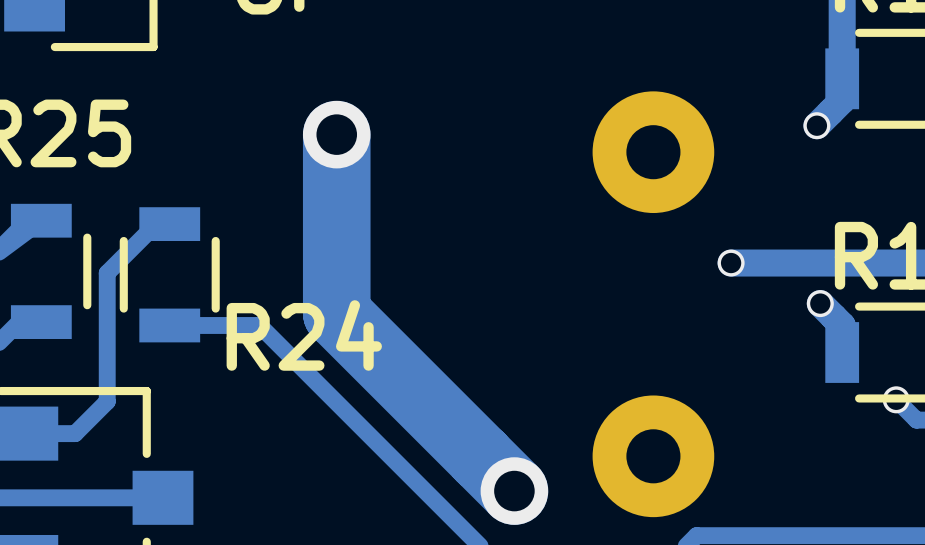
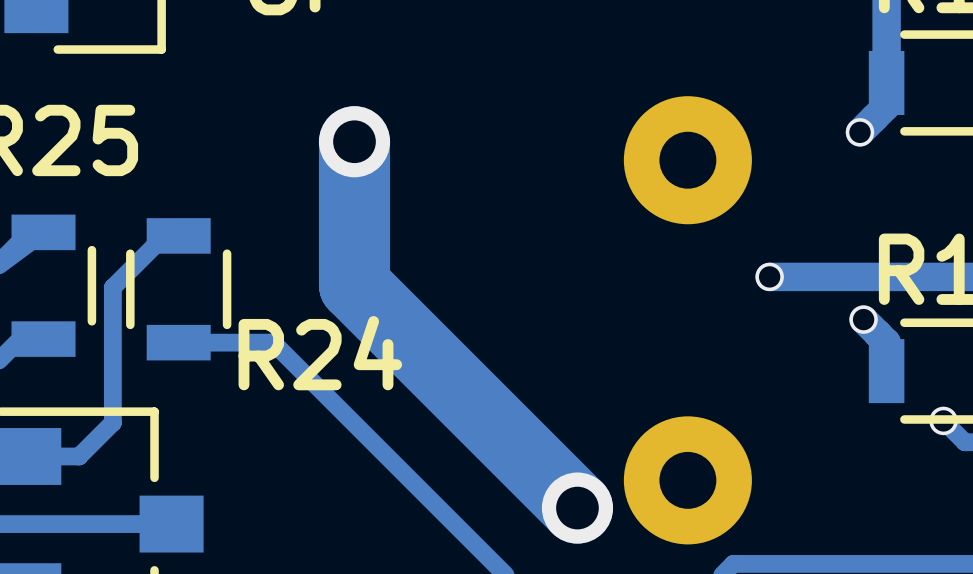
track: (336, 270) (336, 313) (514, 491) -> (354, 285) (577, 508)
via position: (514, 491) -> (577, 508)

